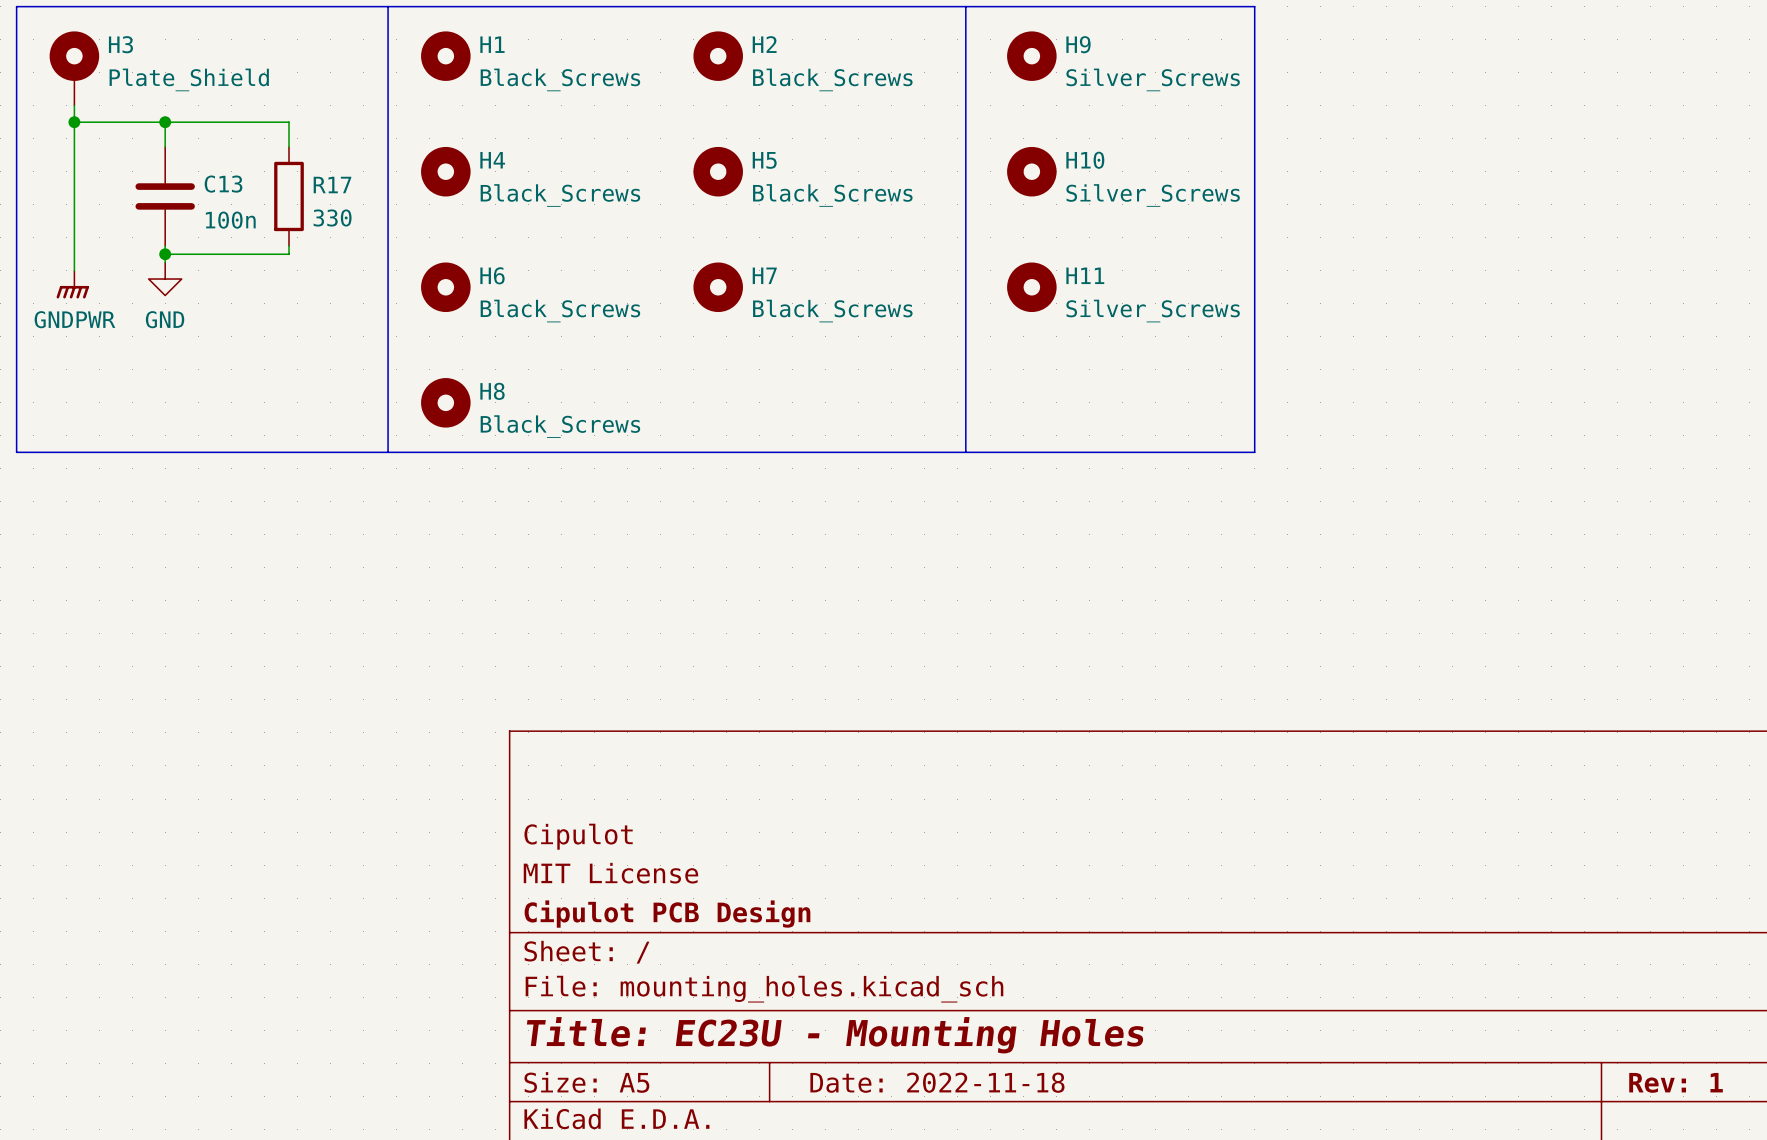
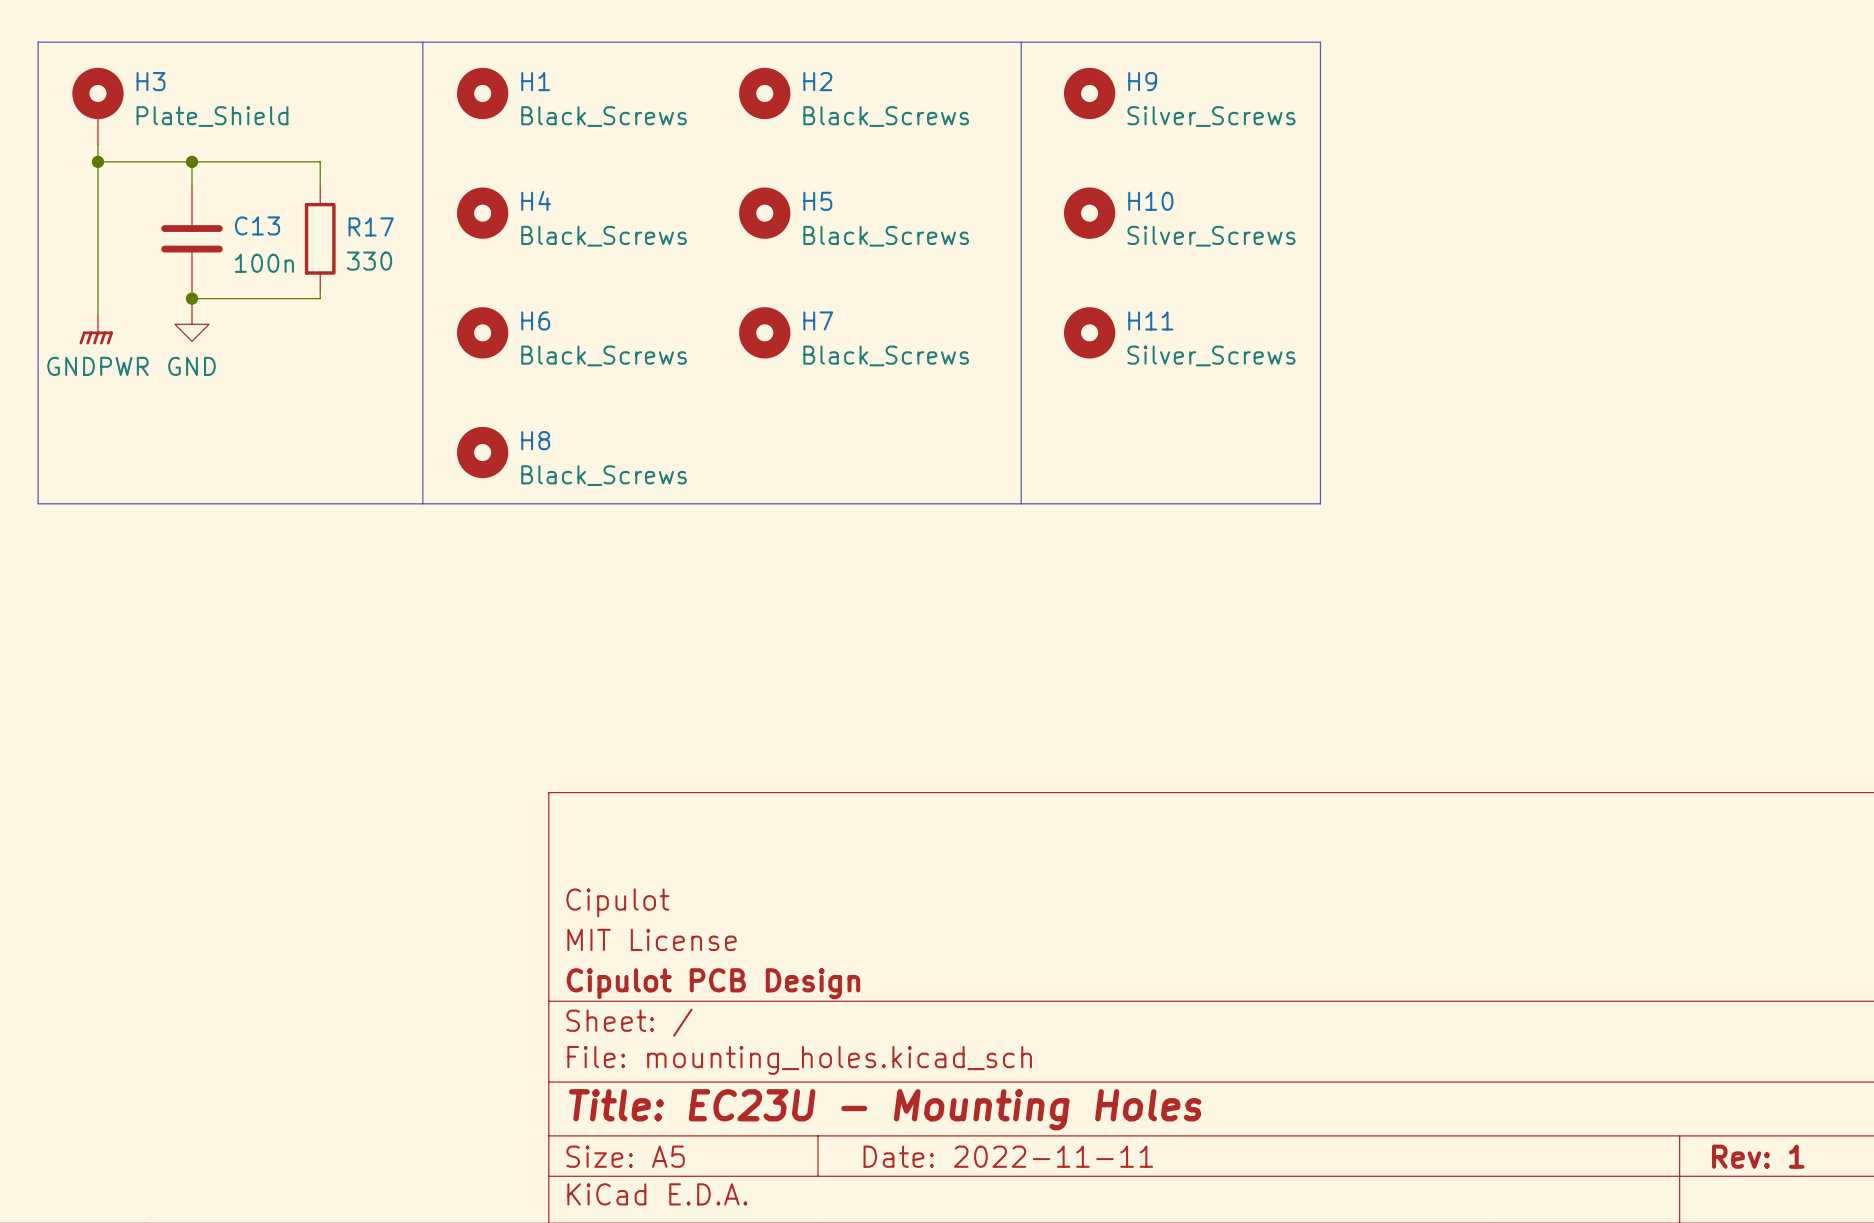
title block: Date: 2022-11-18 (937, 1082) -> Date: 2022-11-11 (1008, 1156)

